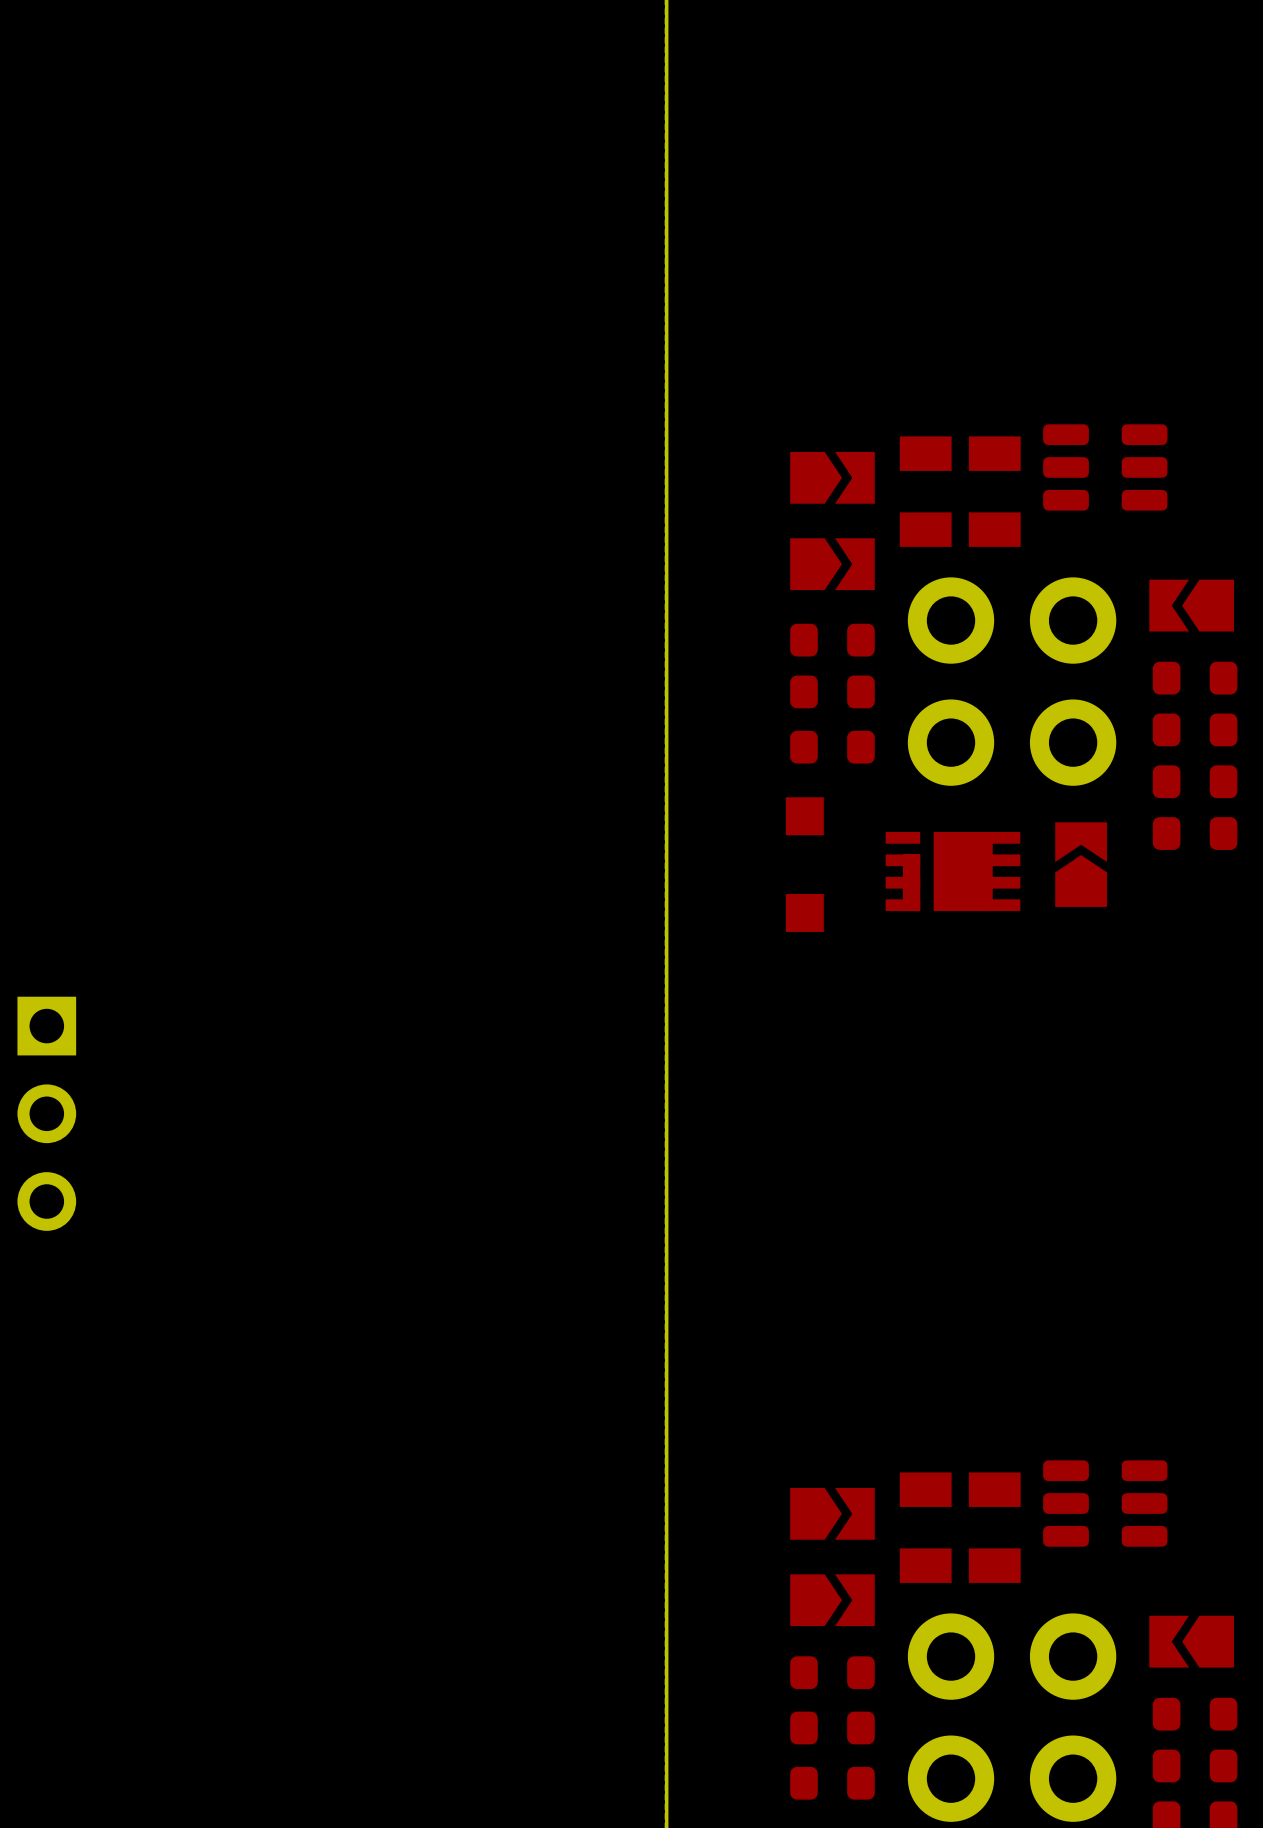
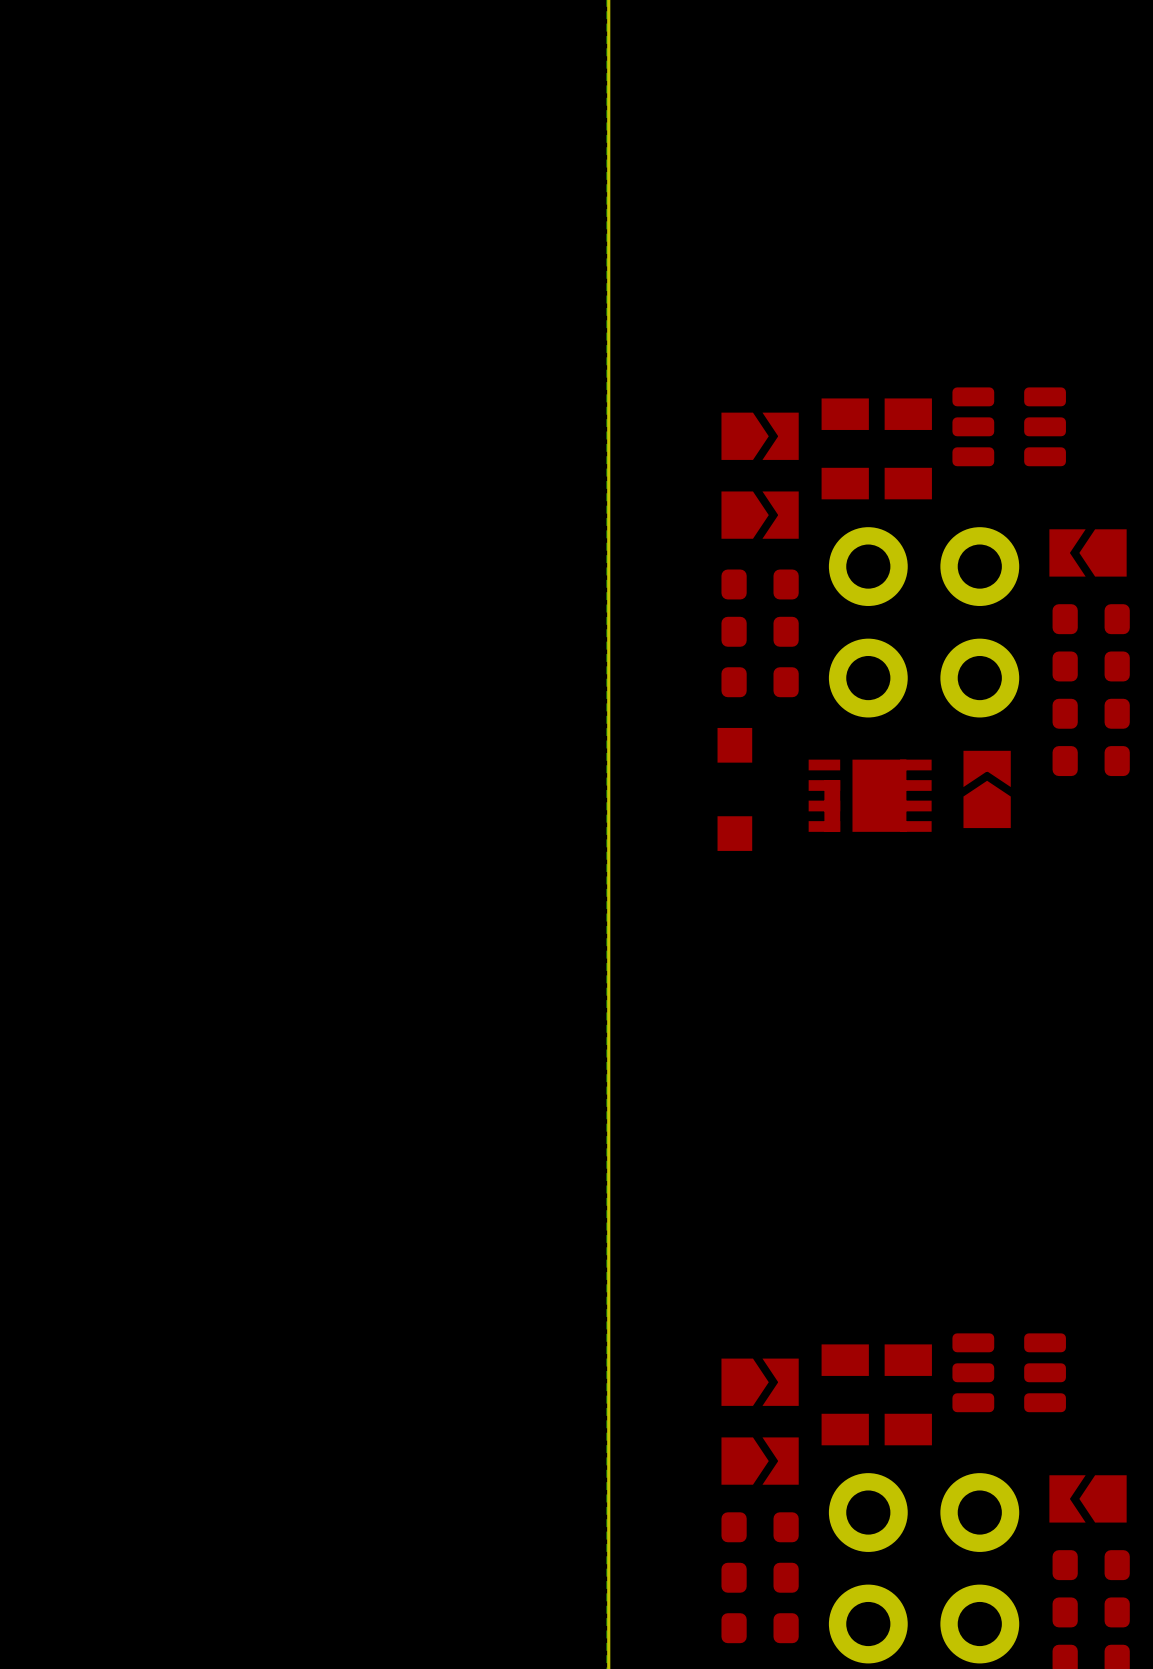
part: (46, 1113) -> none

